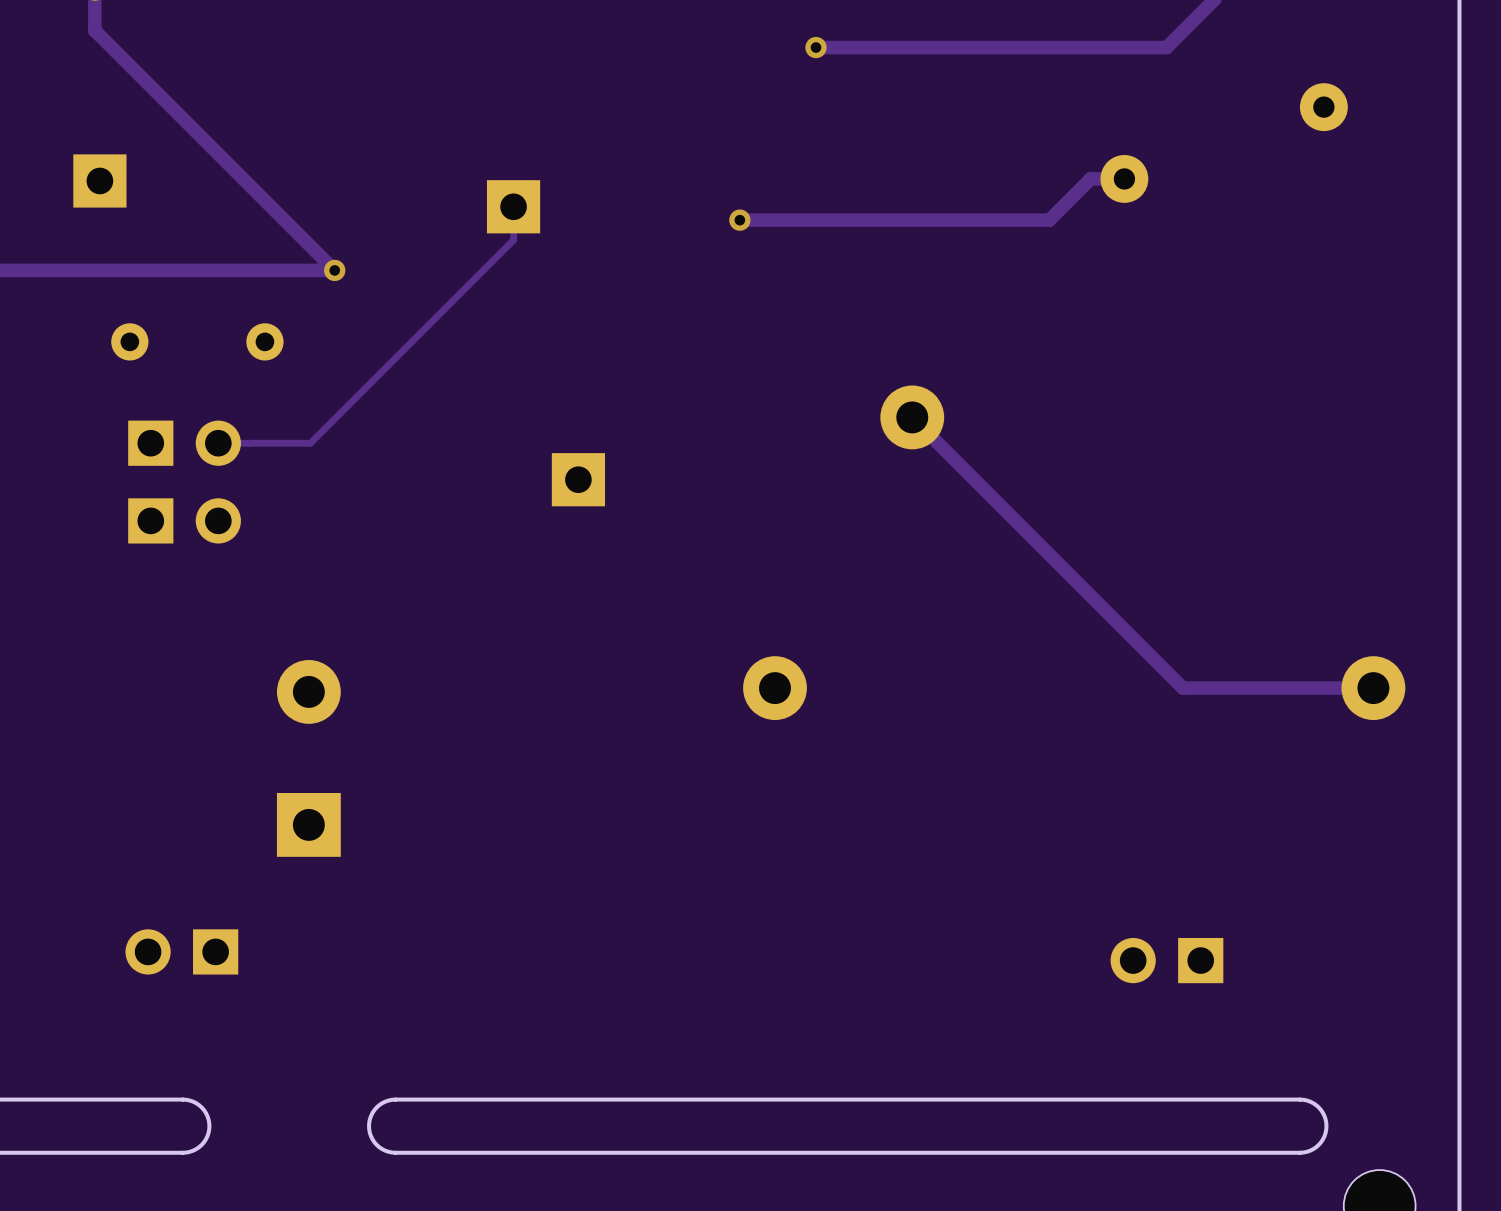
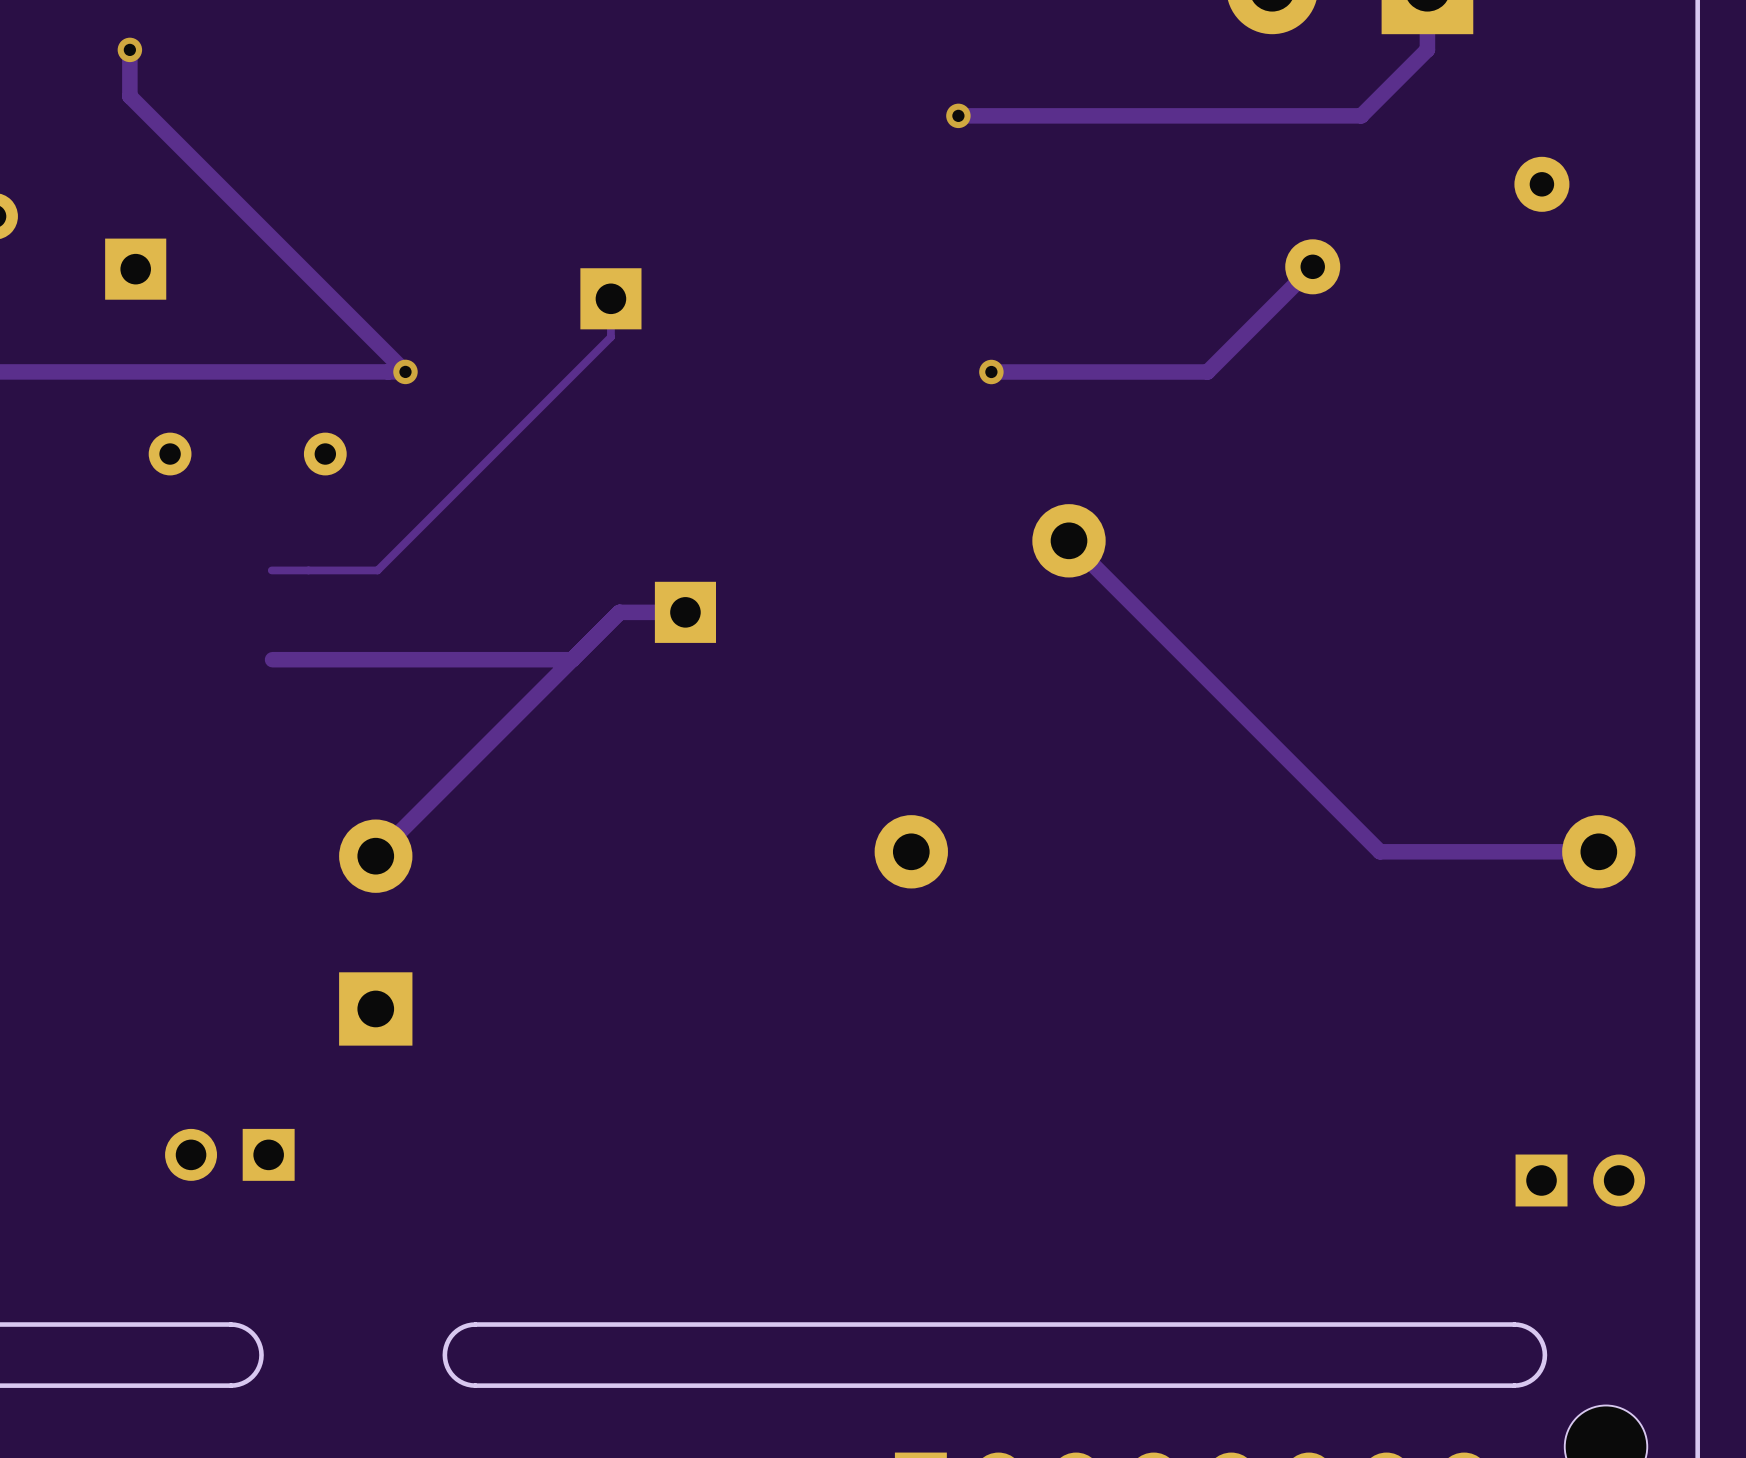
track: (1124, 178) (1090, 178) (1049, 220) (739, 220) -> (1312, 266) (1207, 371) (991, 371)
via position: (739, 220) -> (991, 371)
part: (184, 443) -> none
track: none -> (685, 612) (619, 612) (375, 856)
part: (184, 520) -> none
track: none -> (572, 659) (272, 659)
part rotation: 0° (1166, 960) -> 180° (1580, 1180)
part position: (1166, 960) -> (1580, 1180)

